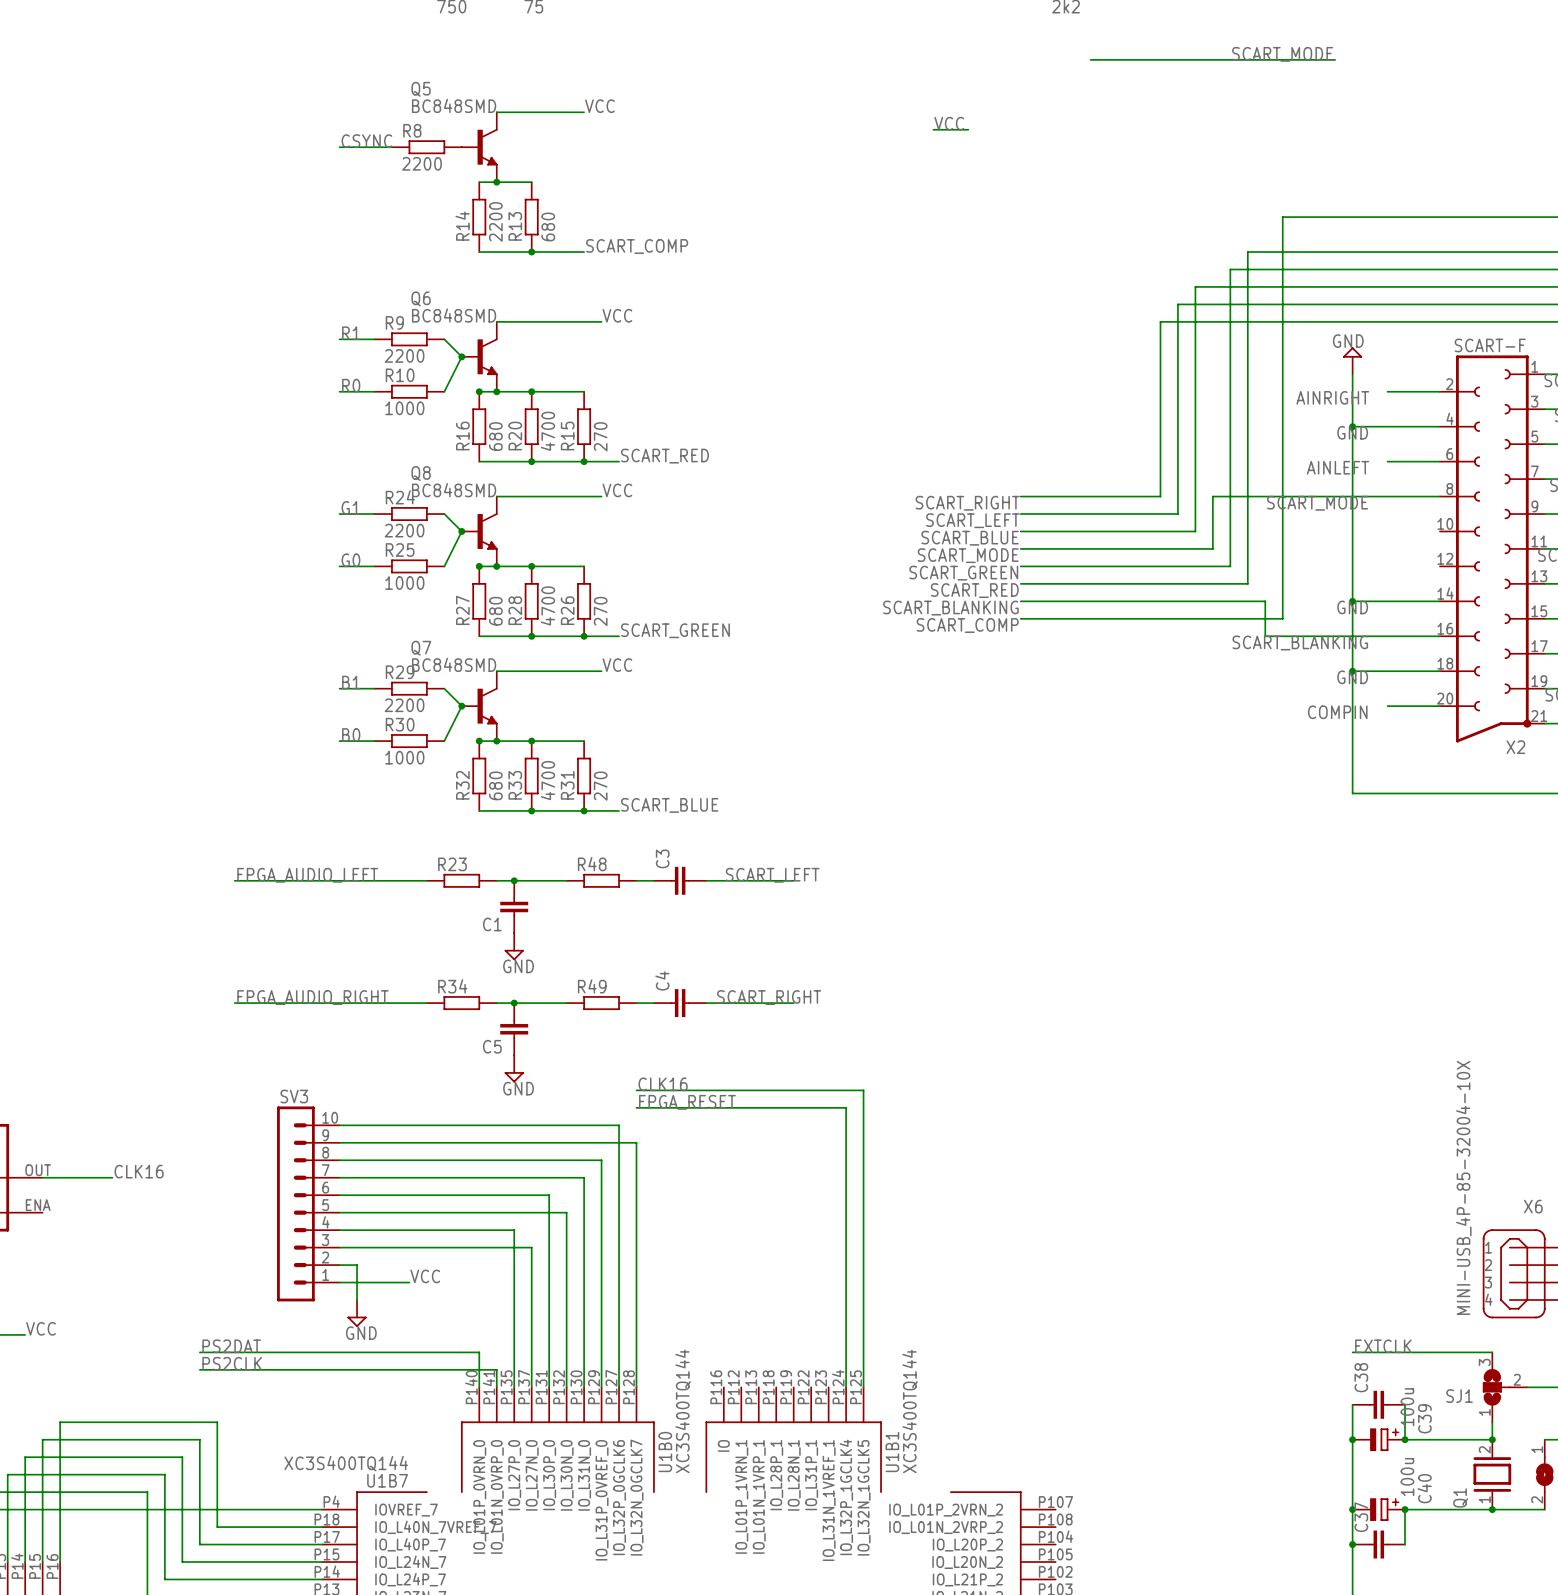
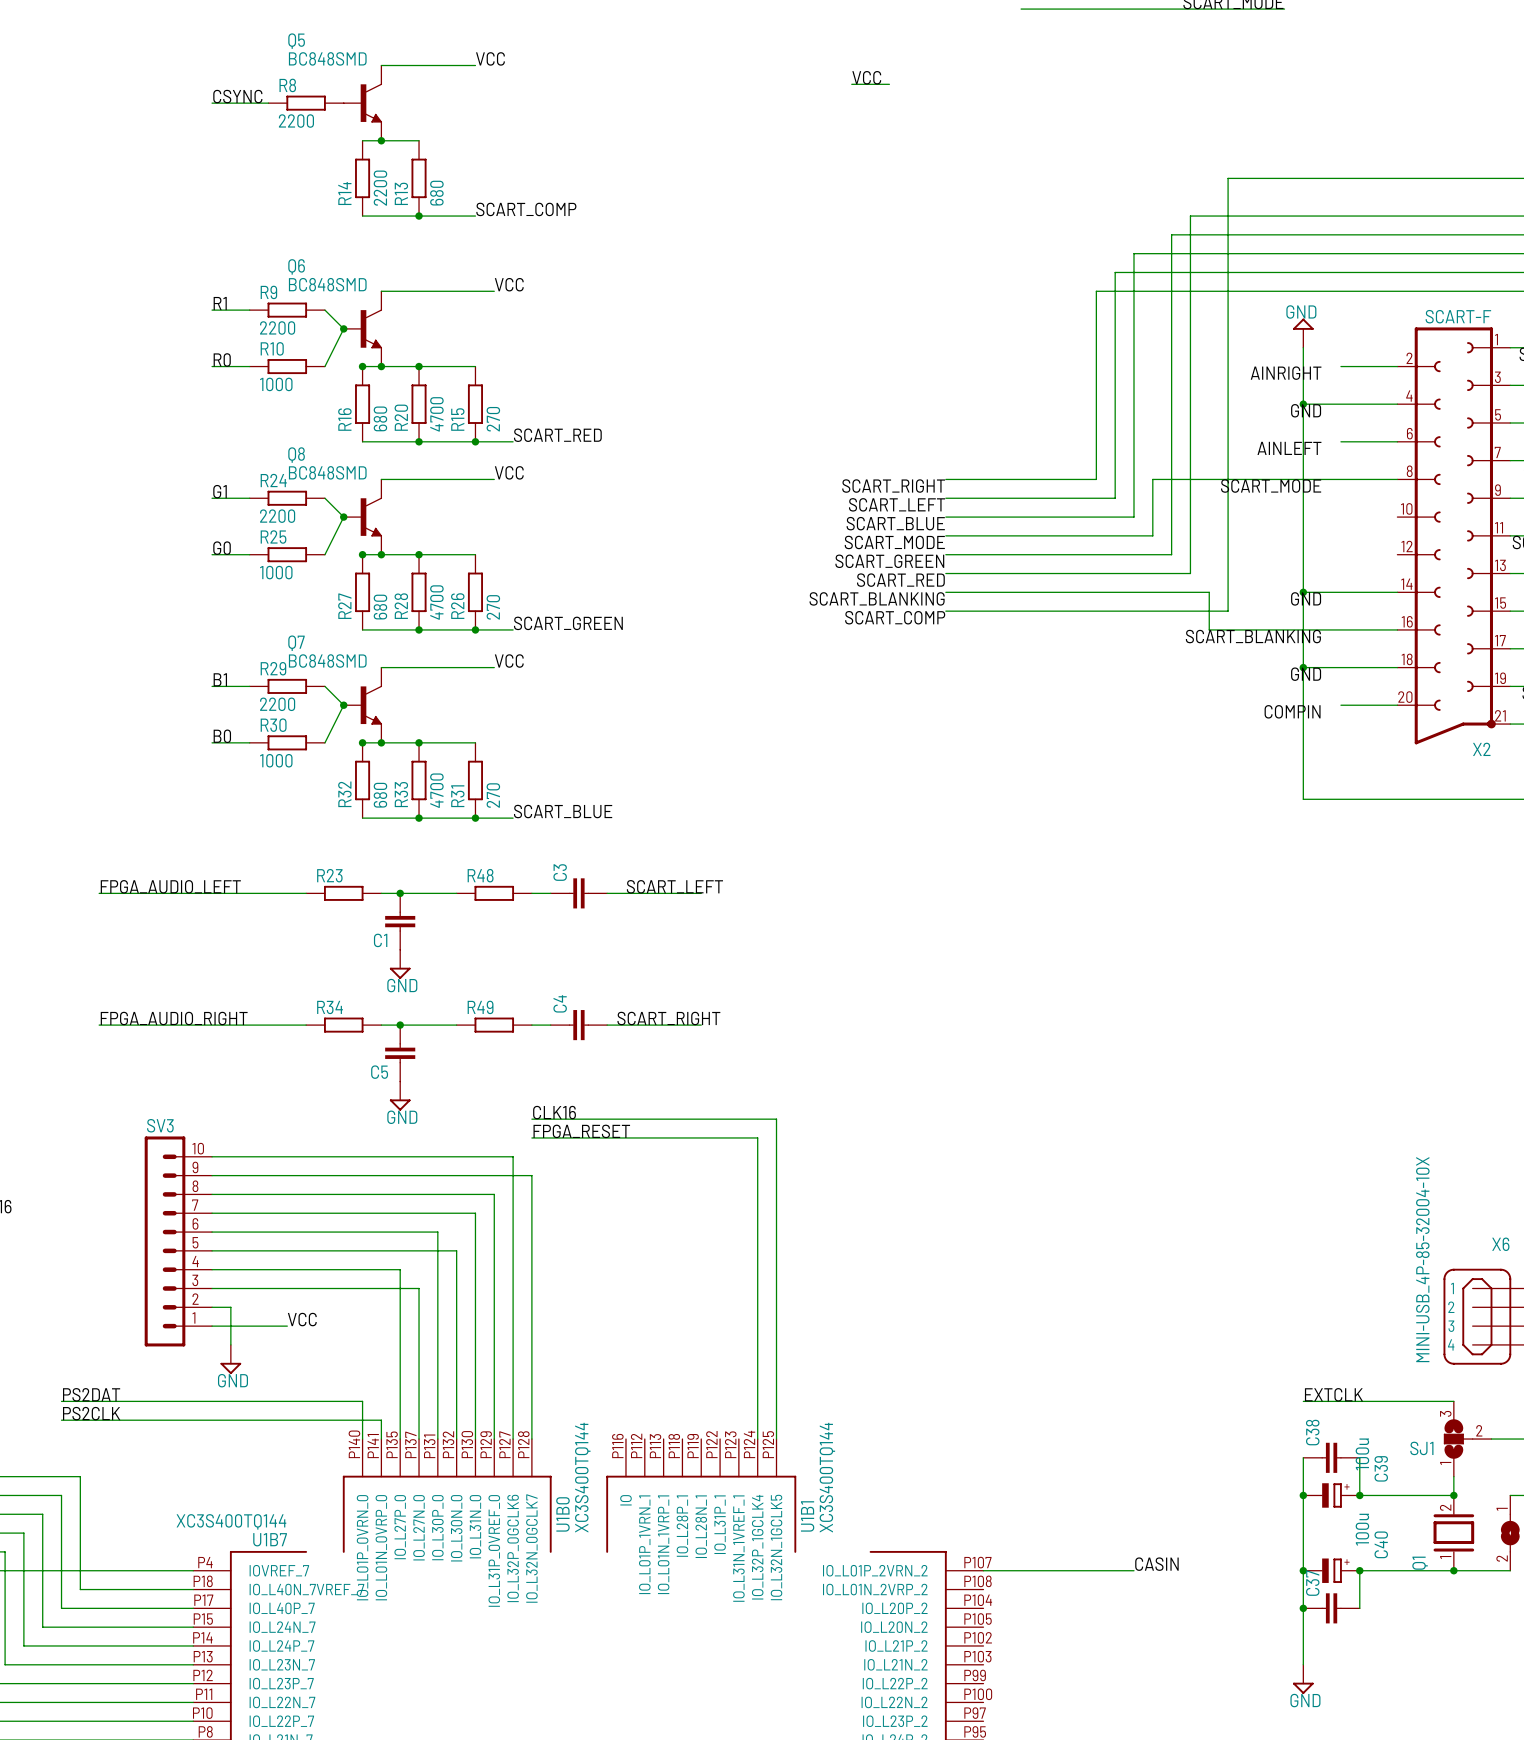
label: none -> CASIN (1156, 1564)
wire: none -> (983, 1570) (1133, 1570)

